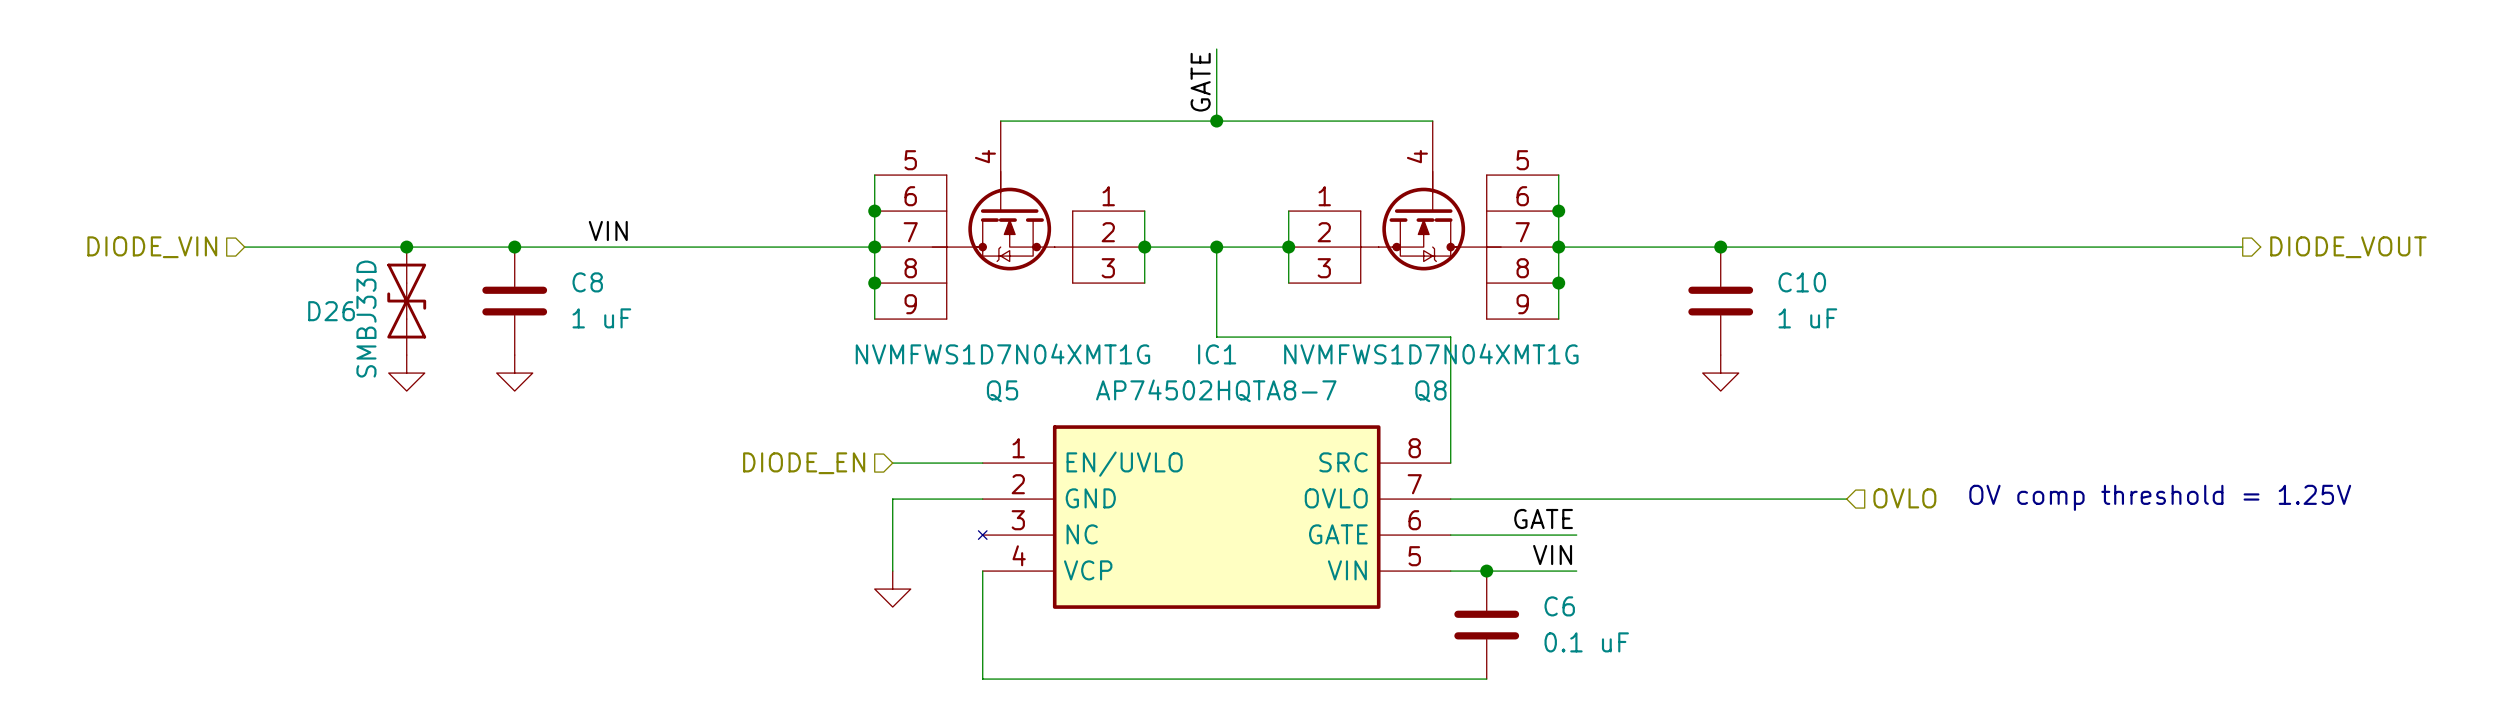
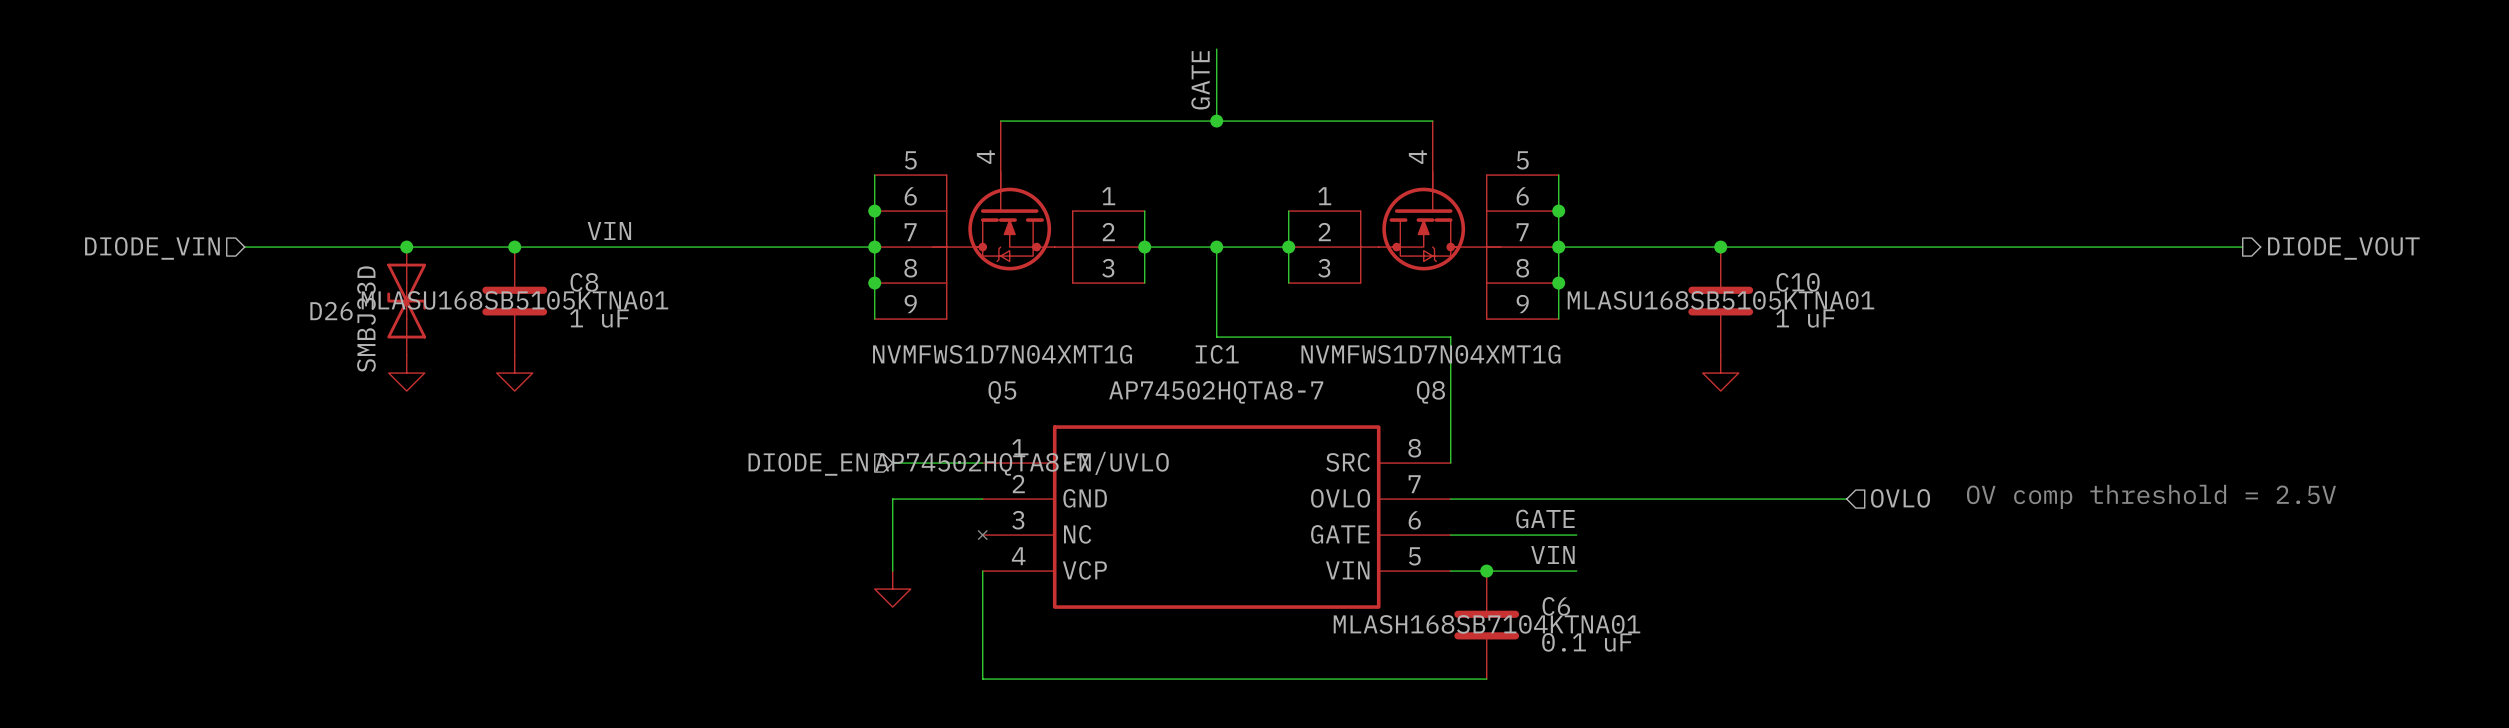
C8 text: none -> MLASU168SB5105KTNA01 (514, 300)
C10 text: none -> MLASU168SB5105KTNA01 (1720, 300)
IC1 text: none -> AP74502HQTA8-7 (982, 464)
text: OV comp threshold = 1.25V (2160, 497) -> OV comp threshold = 2.5V (2151, 496)
C6 text: none -> MLASH168SB7104KTNA01 (1486, 624)

